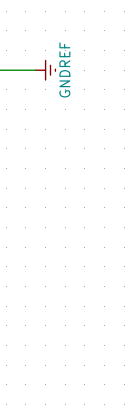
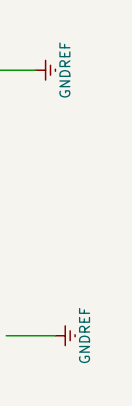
wire: none -> (6, 335) (55, 335)
power symbol: none -> GNDREF (65, 335)

